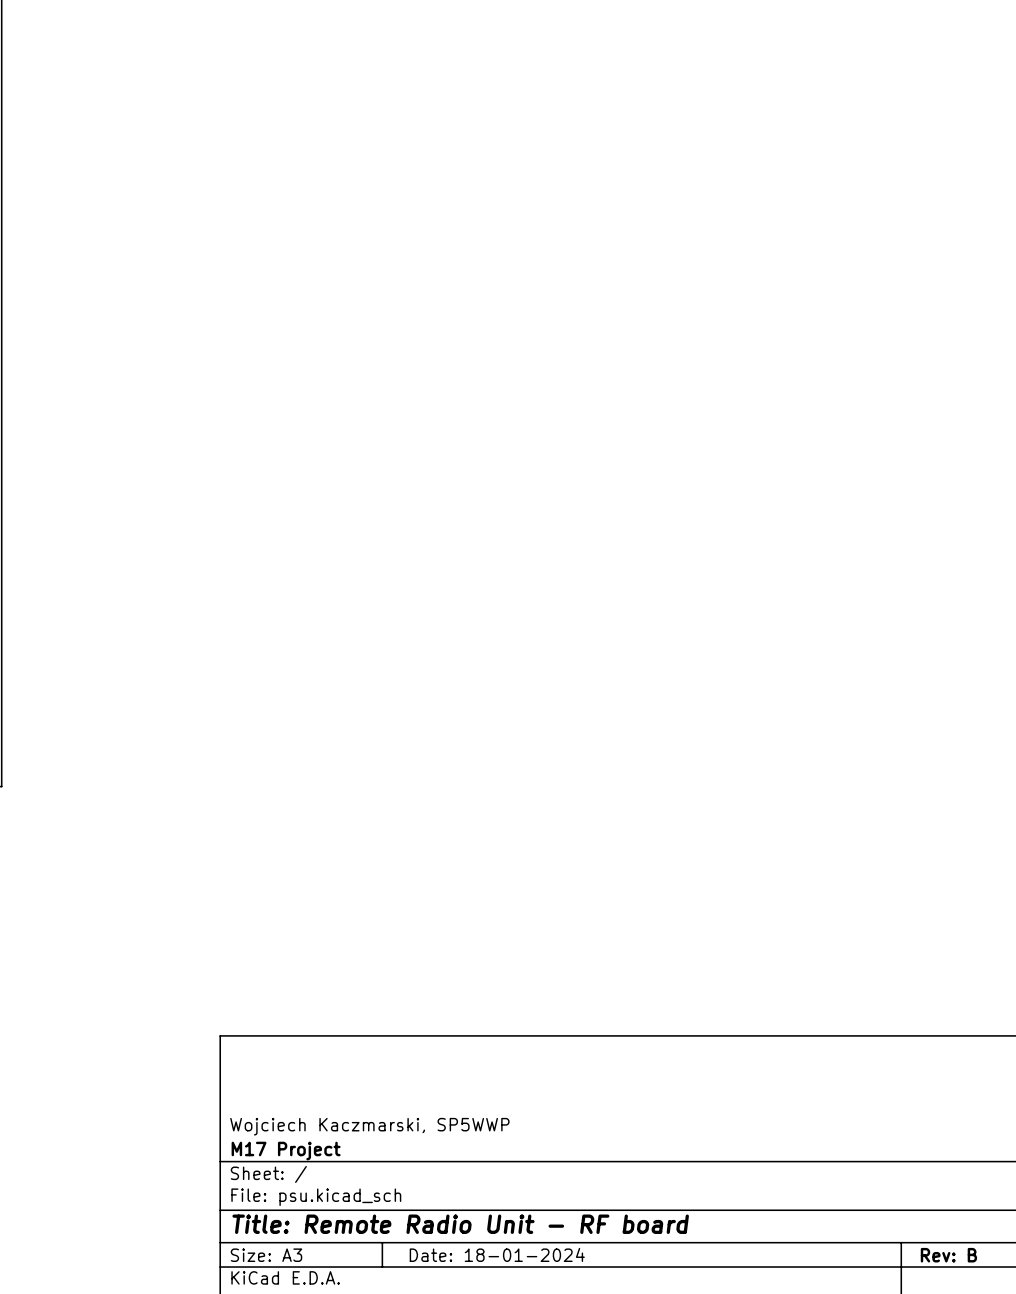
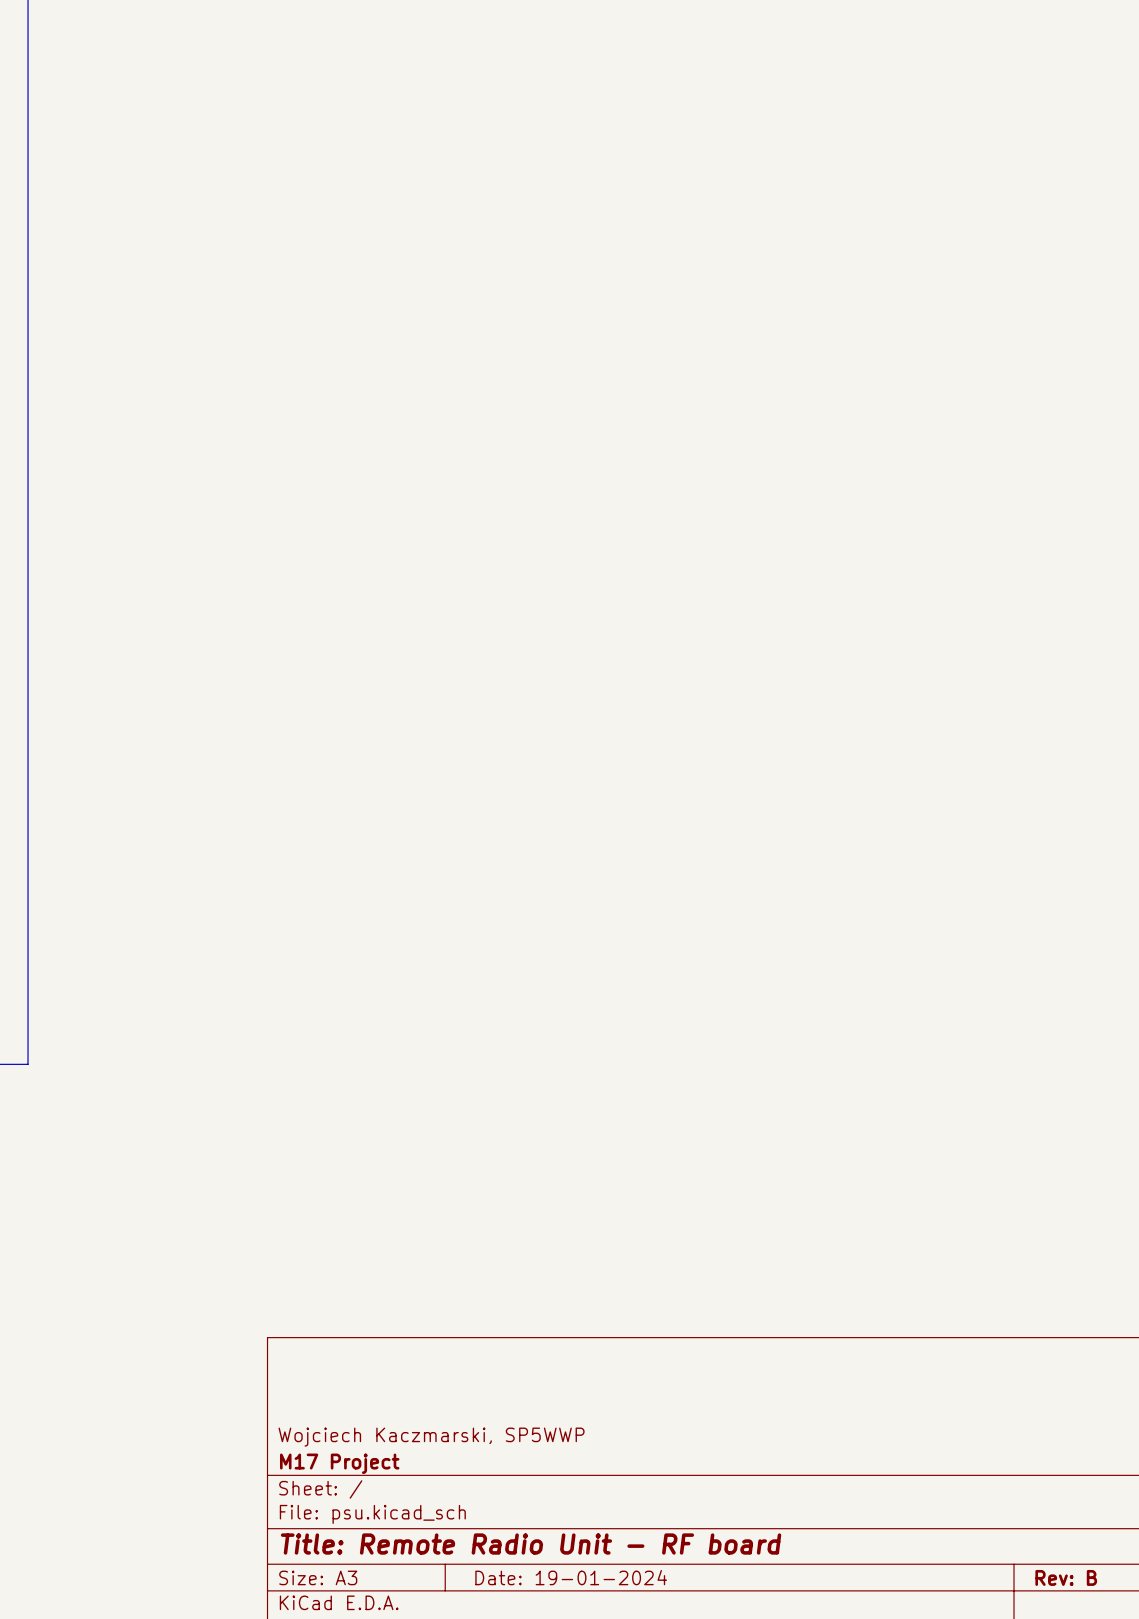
title block: Date: 18-01-2024 (497, 1254) -> Date: 19-01-2024 (571, 1577)

